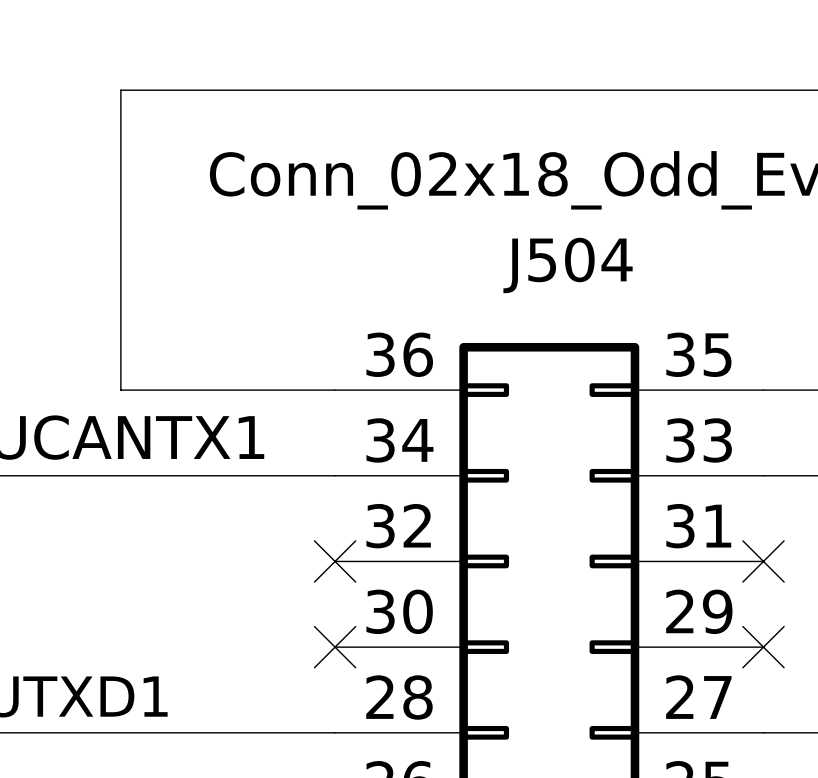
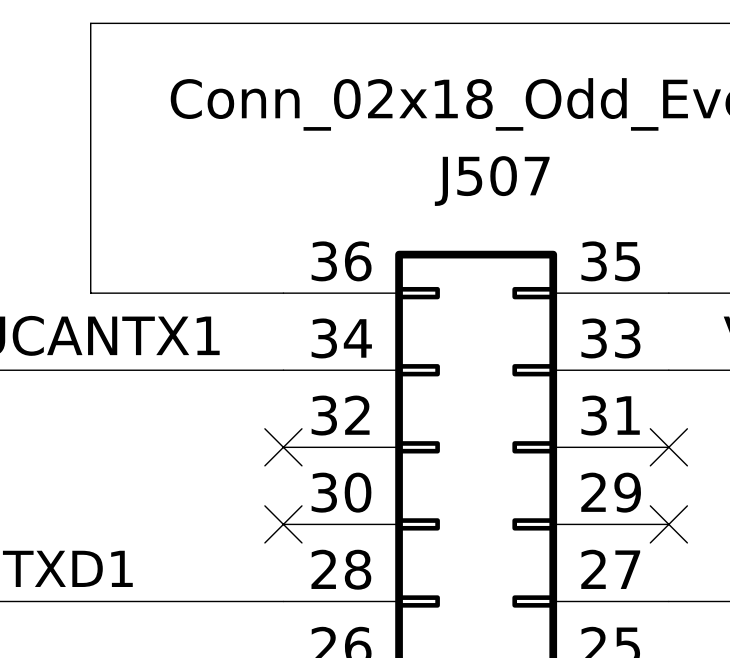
J504 name: J504 (568, 265) -> J507 (492, 181)

